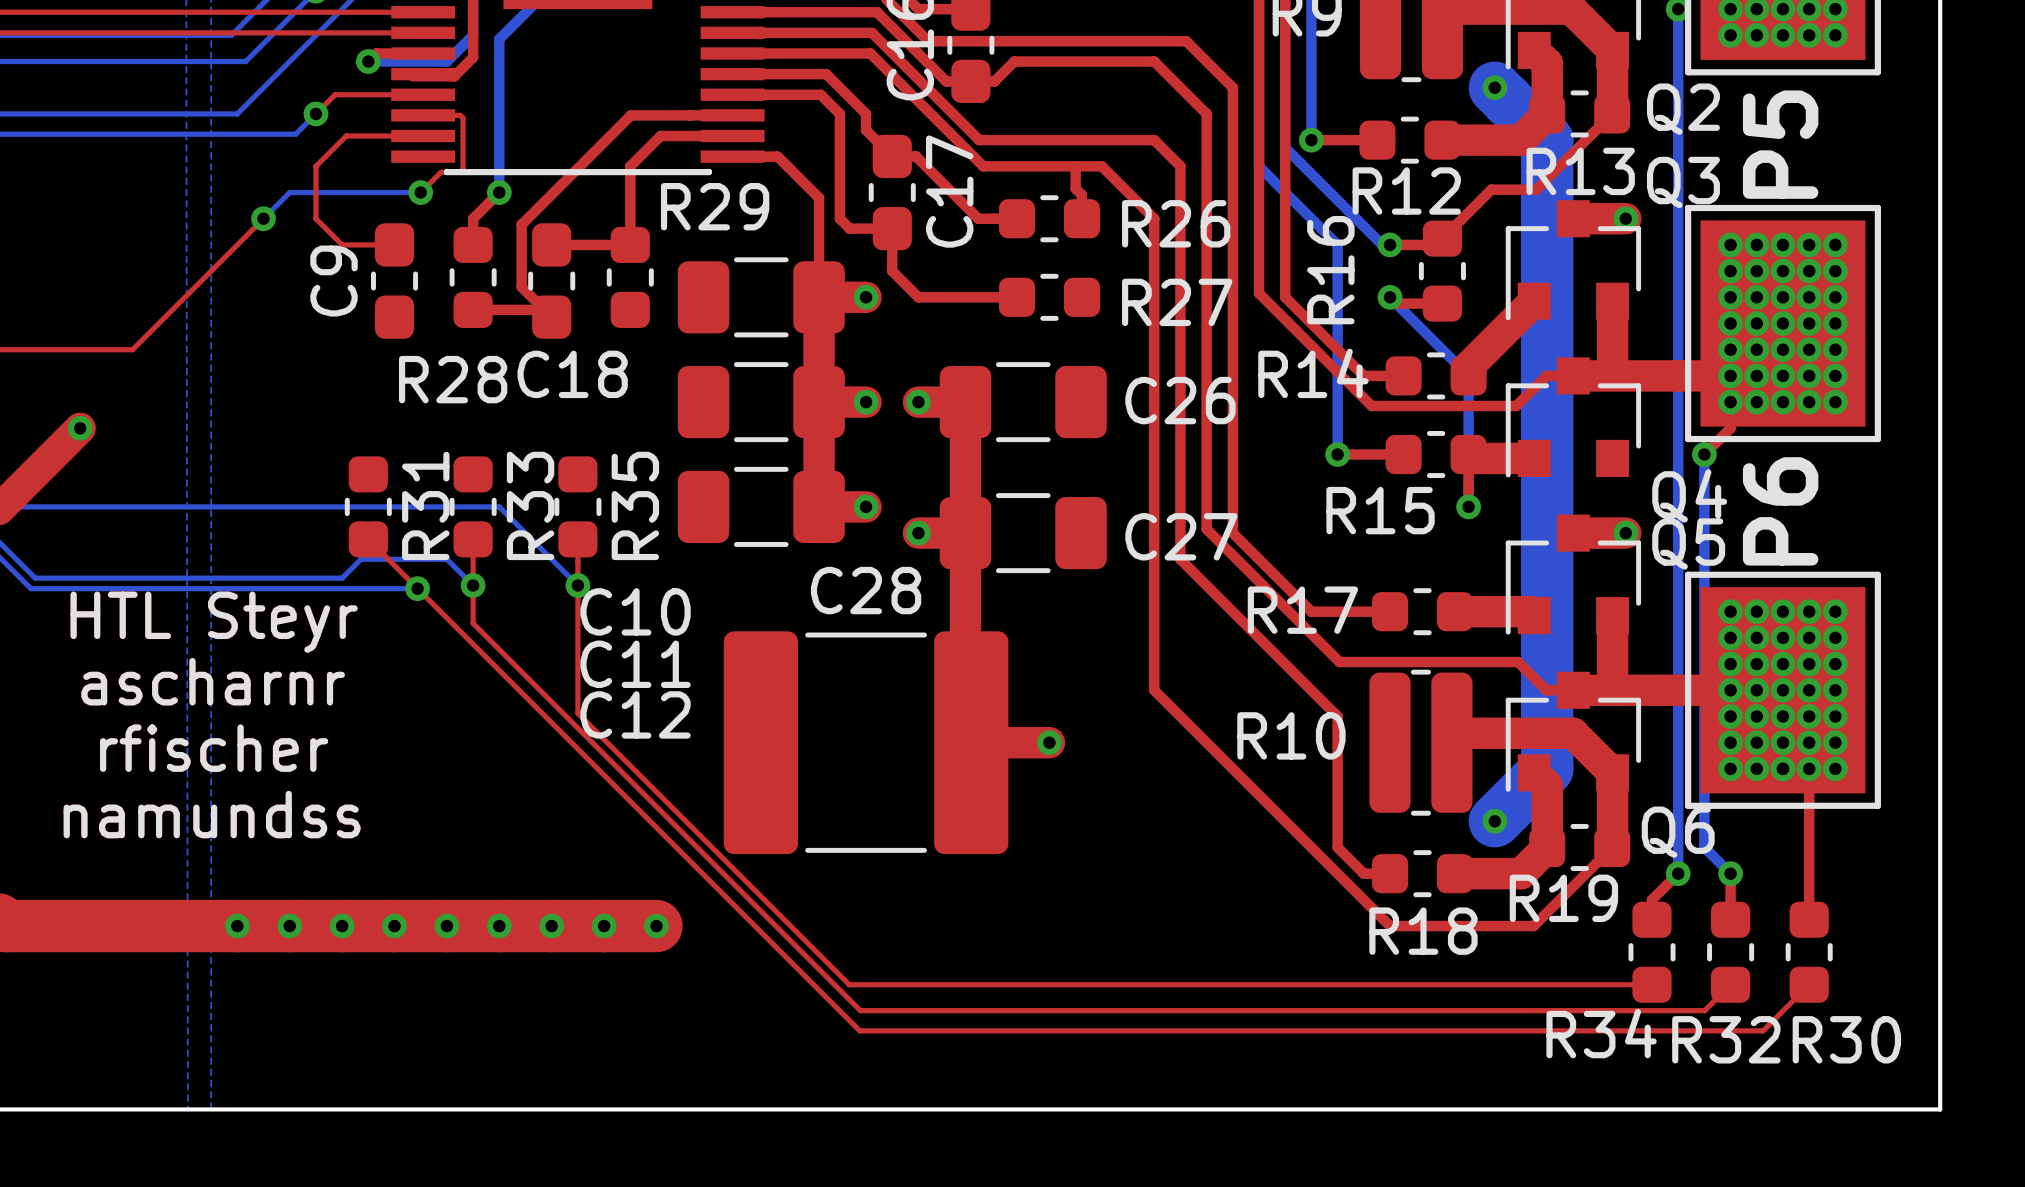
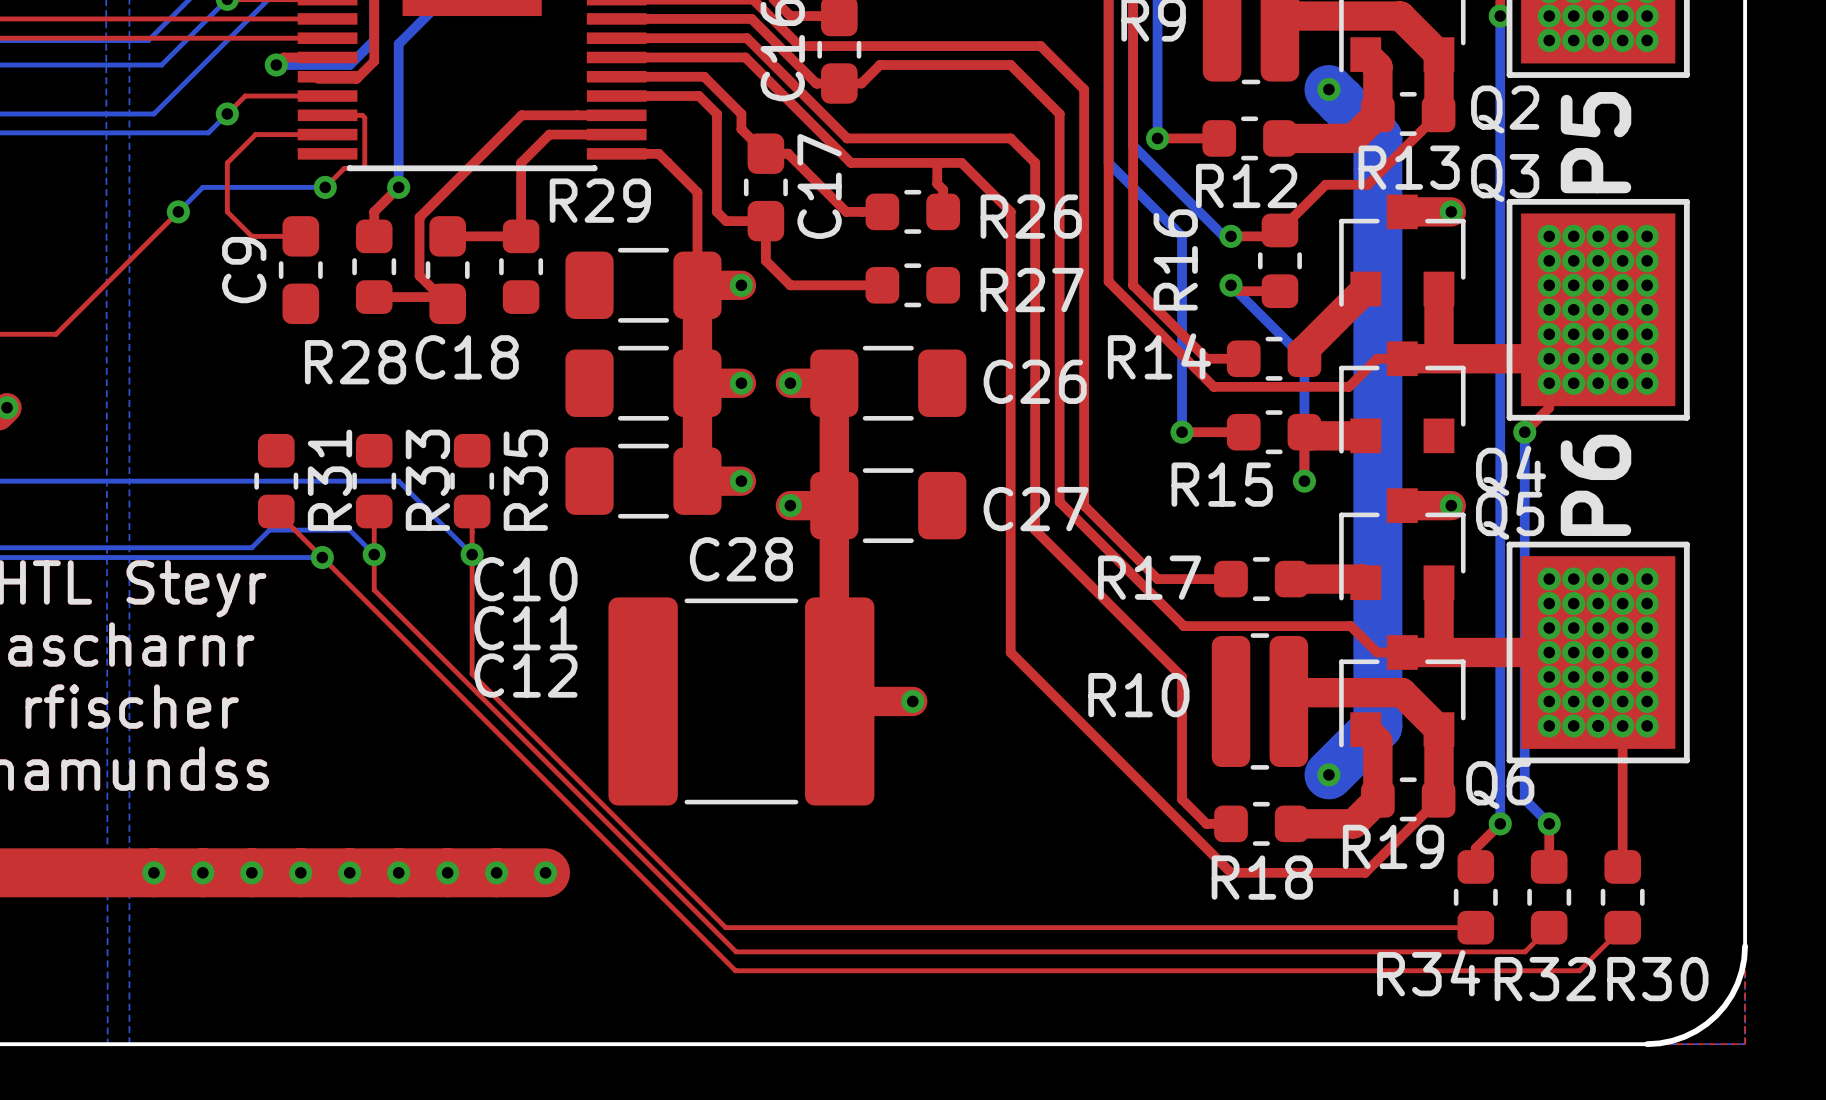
board edge: (1940, 1004) (1940, 1109) (1835, 1109) -> (1745, 946) (1741, 971) (1737, 983) (1724, 1005) (1716, 1015) (1696, 1031) (1684, 1036) (1672, 1040) (1647, 1044)

